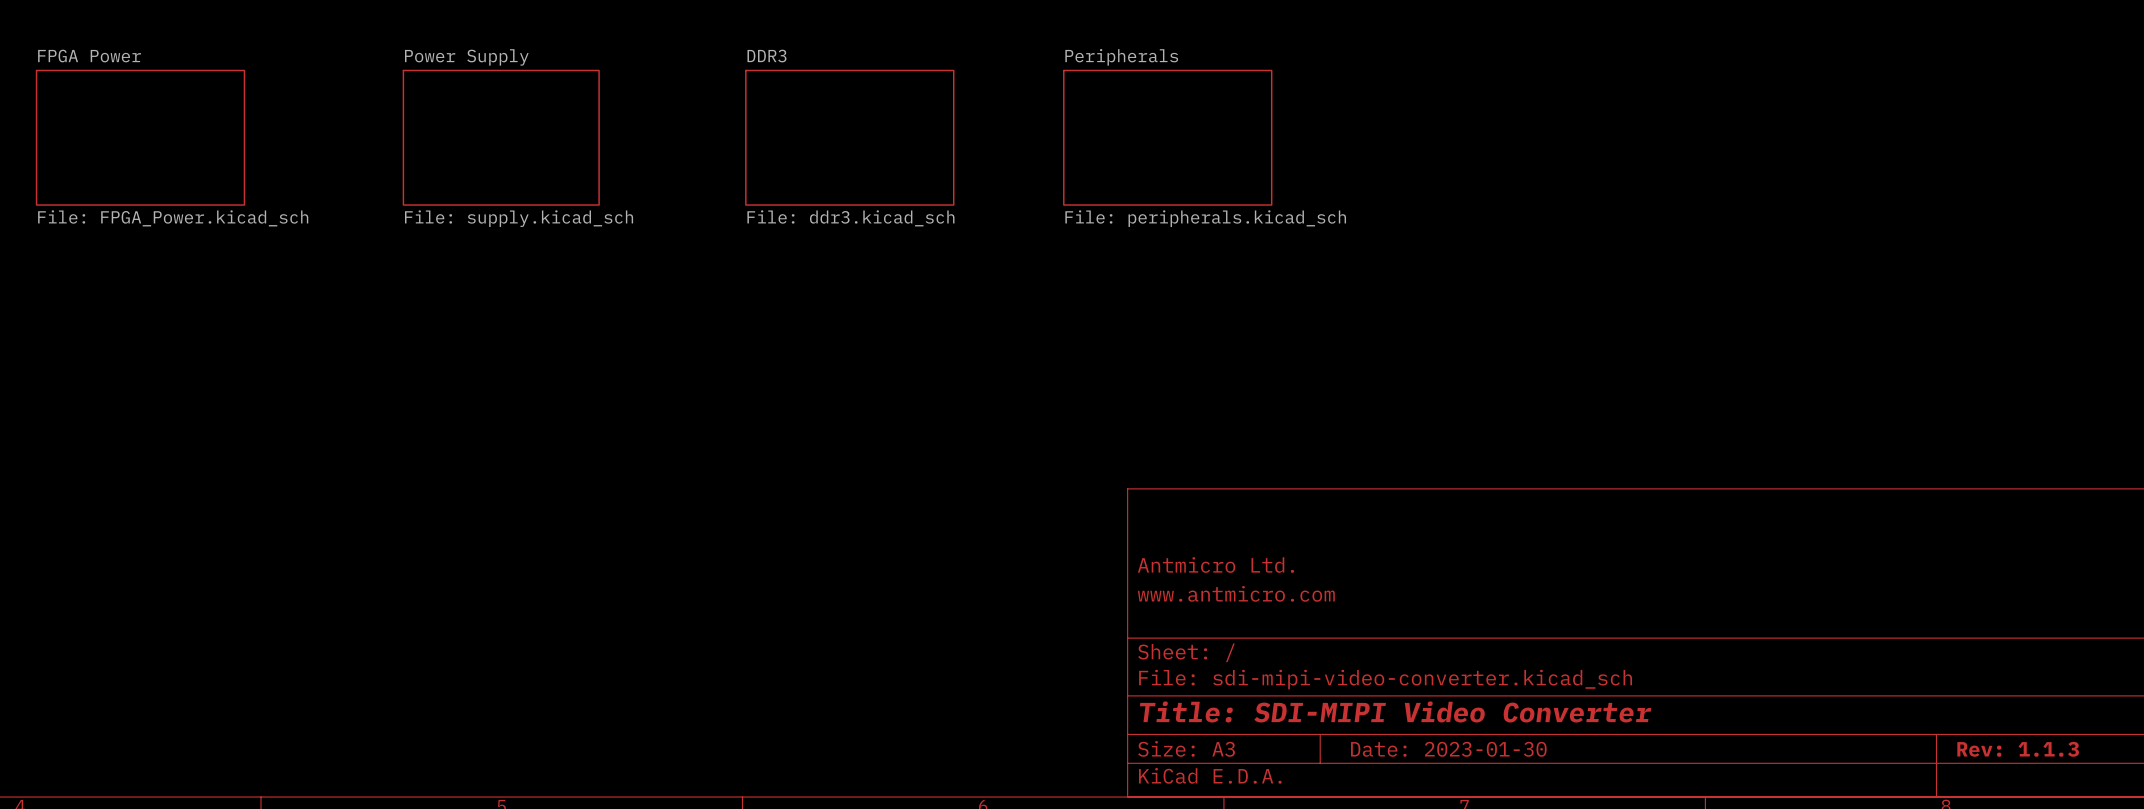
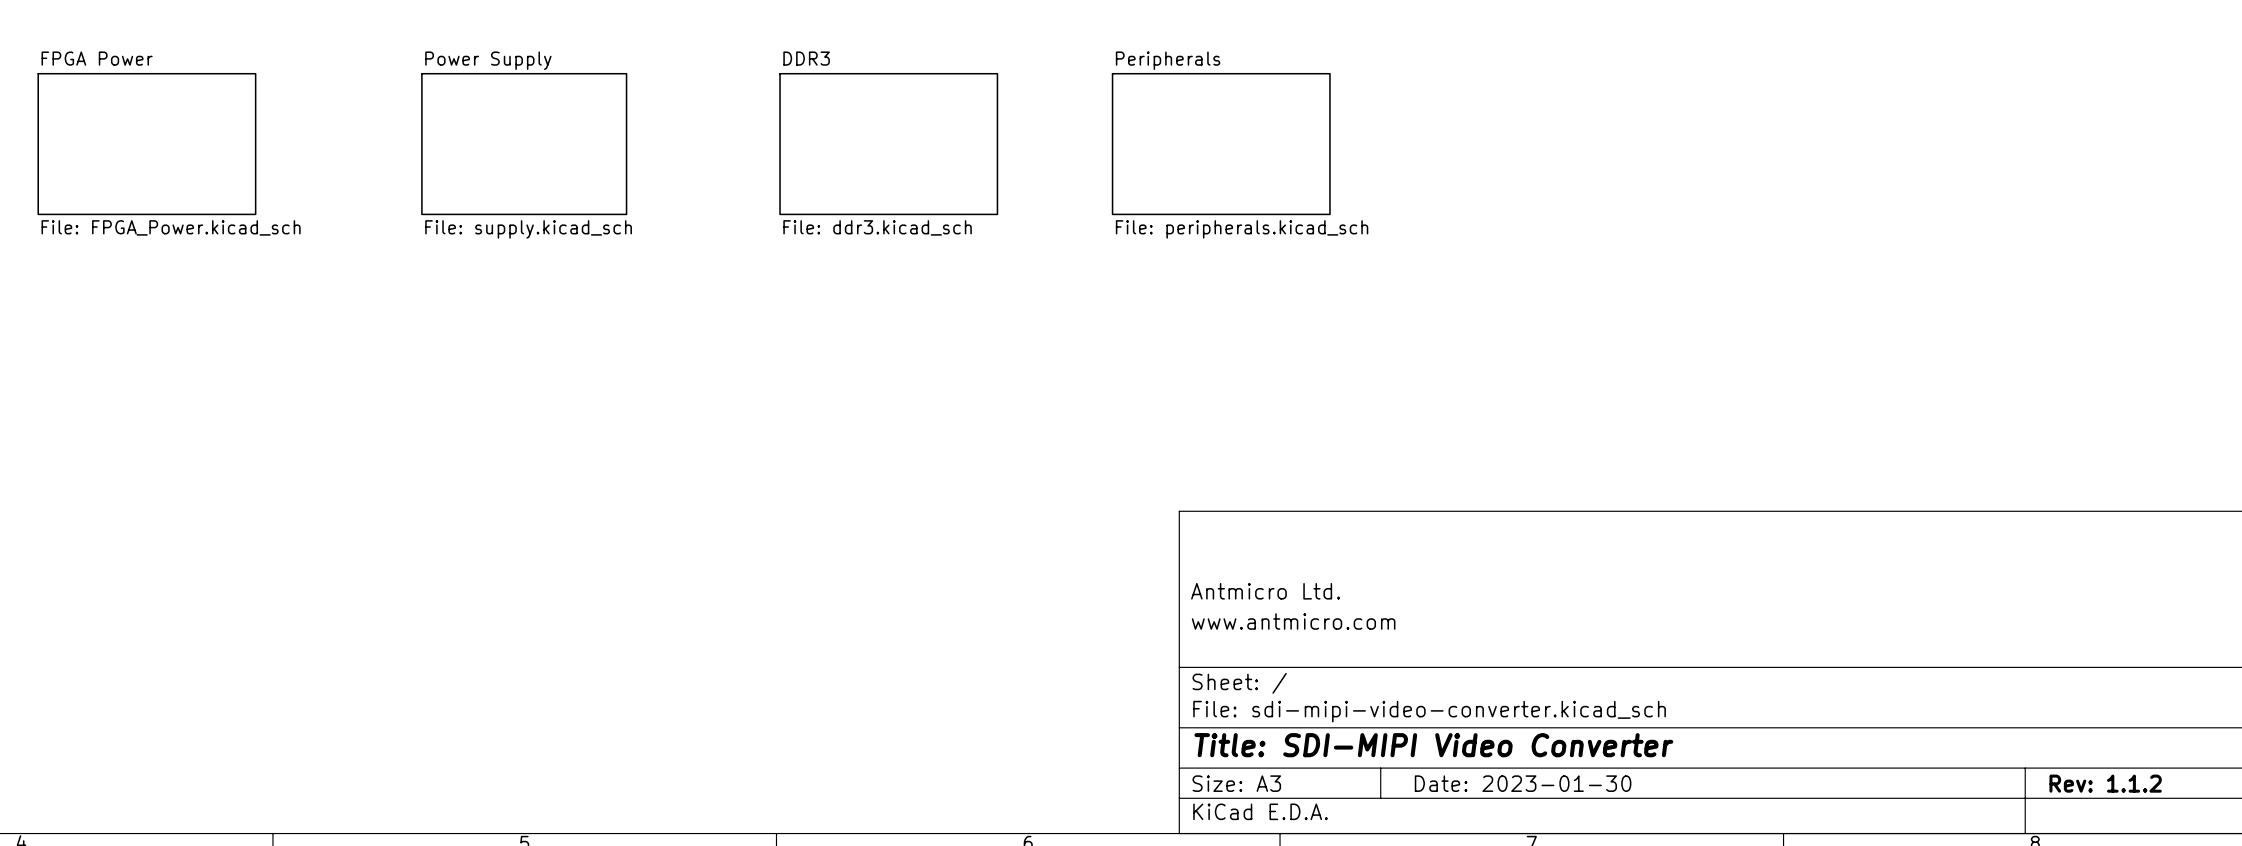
title block: Rev: 1.1.3 (2018, 749) -> Rev: 1.1.2 (2105, 783)

